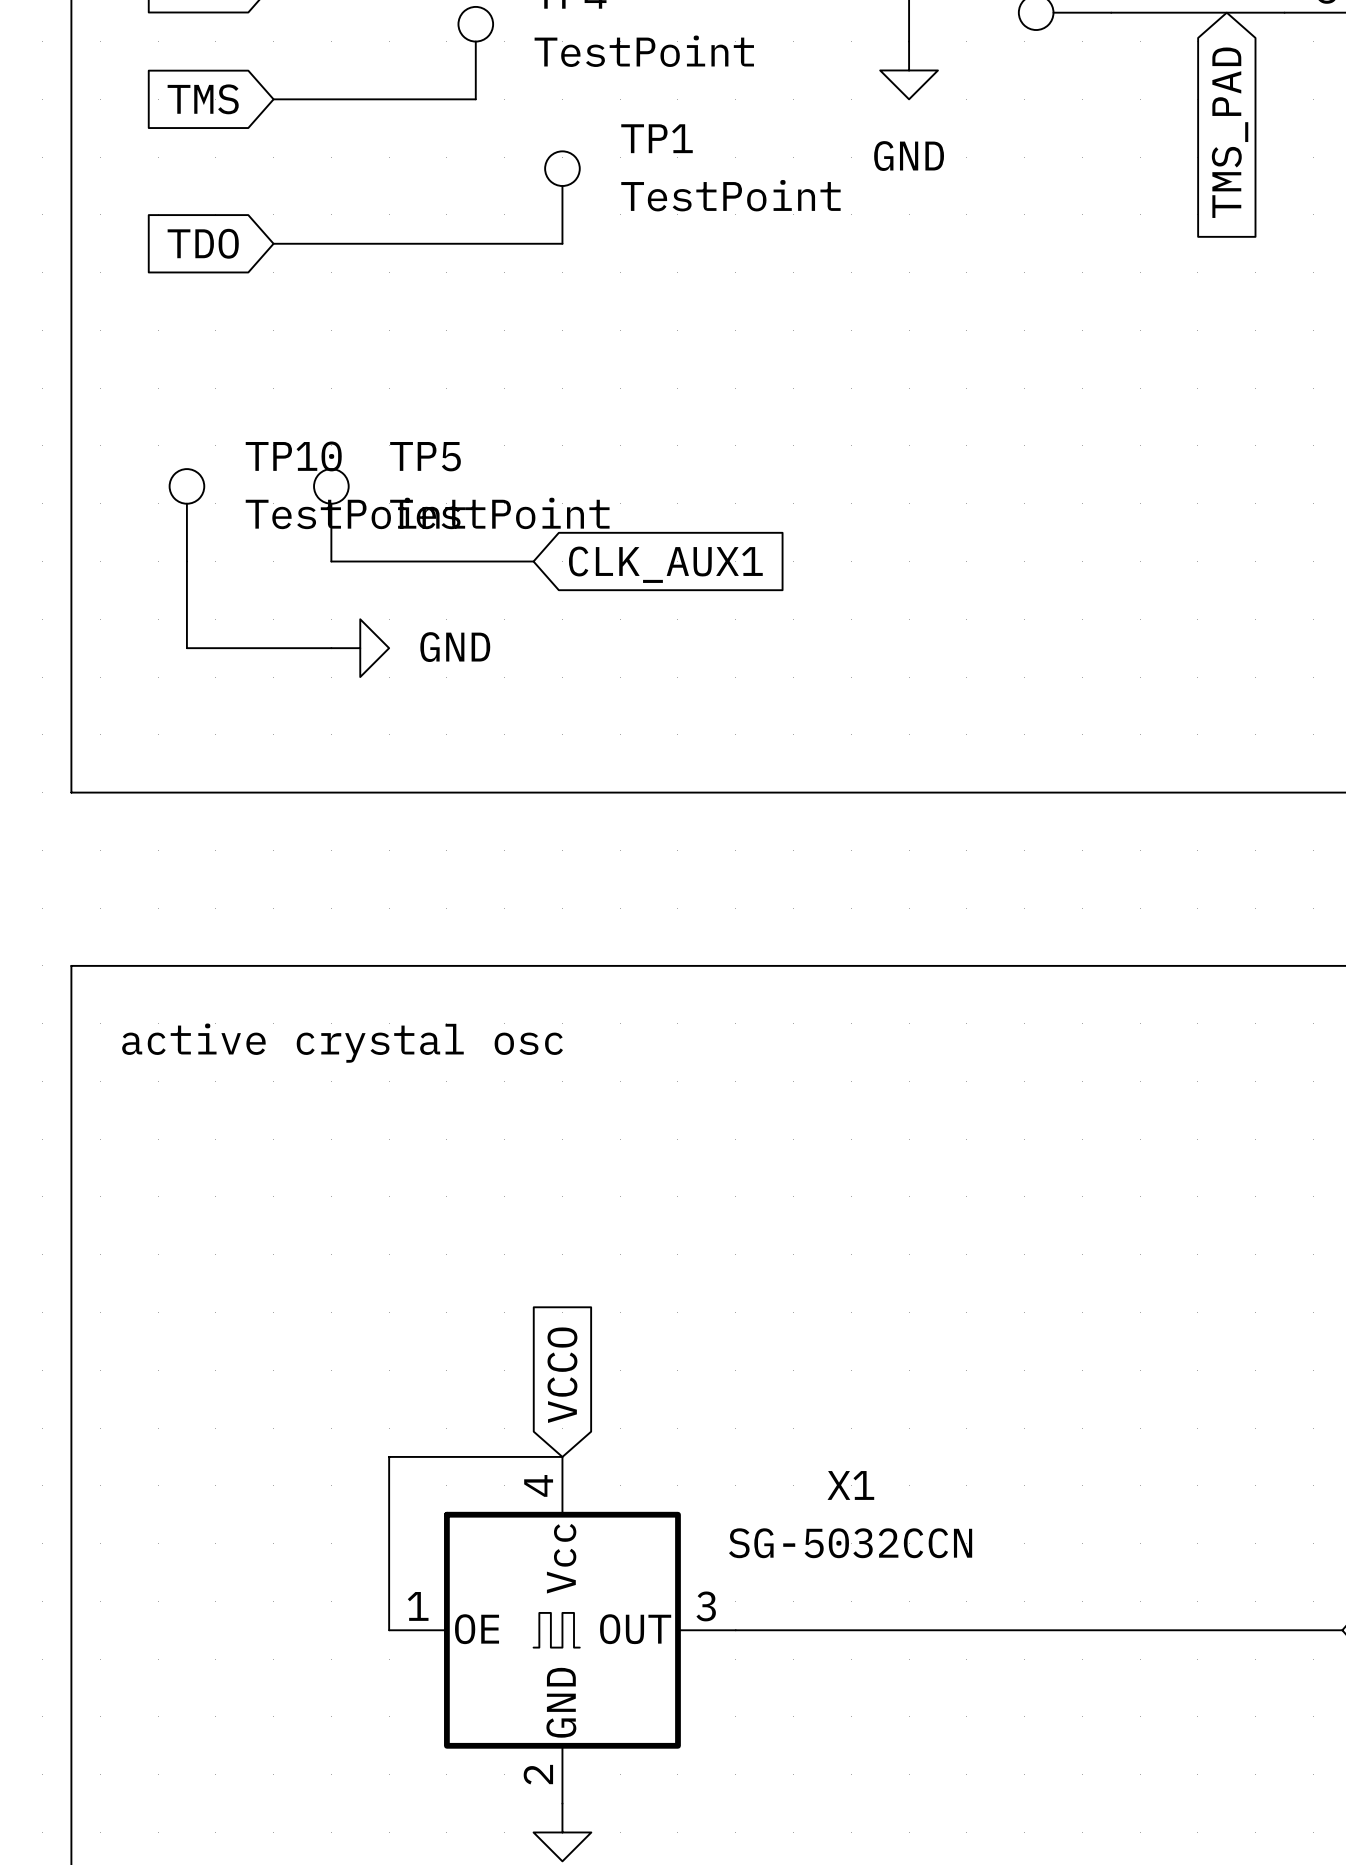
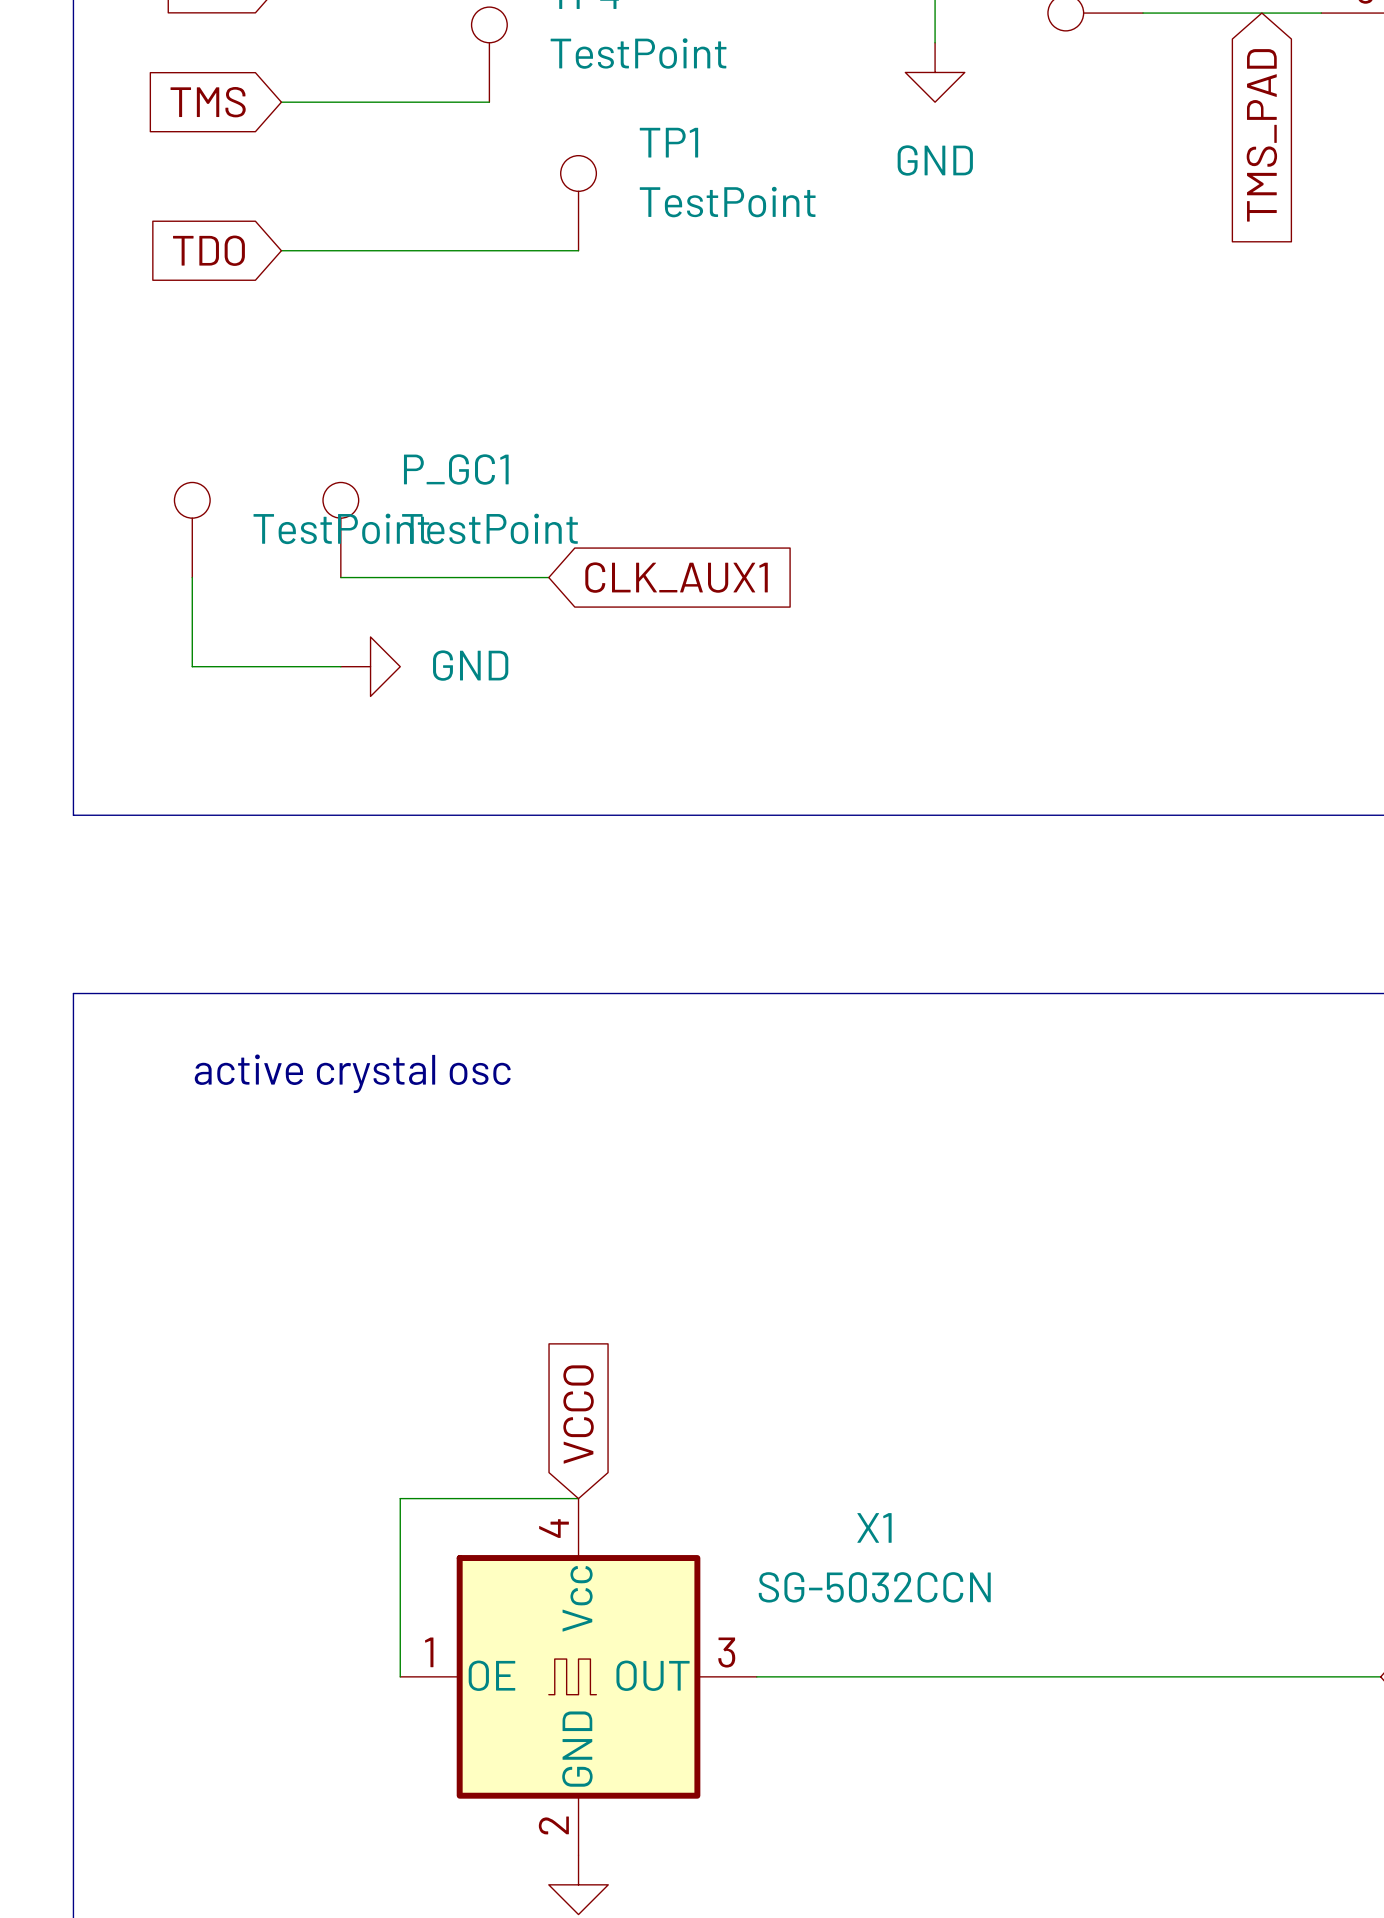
TP10 name: TP10 (293, 456) -> none
TP5 name: TP5 (425, 456) -> P_GC1 (456, 469)

